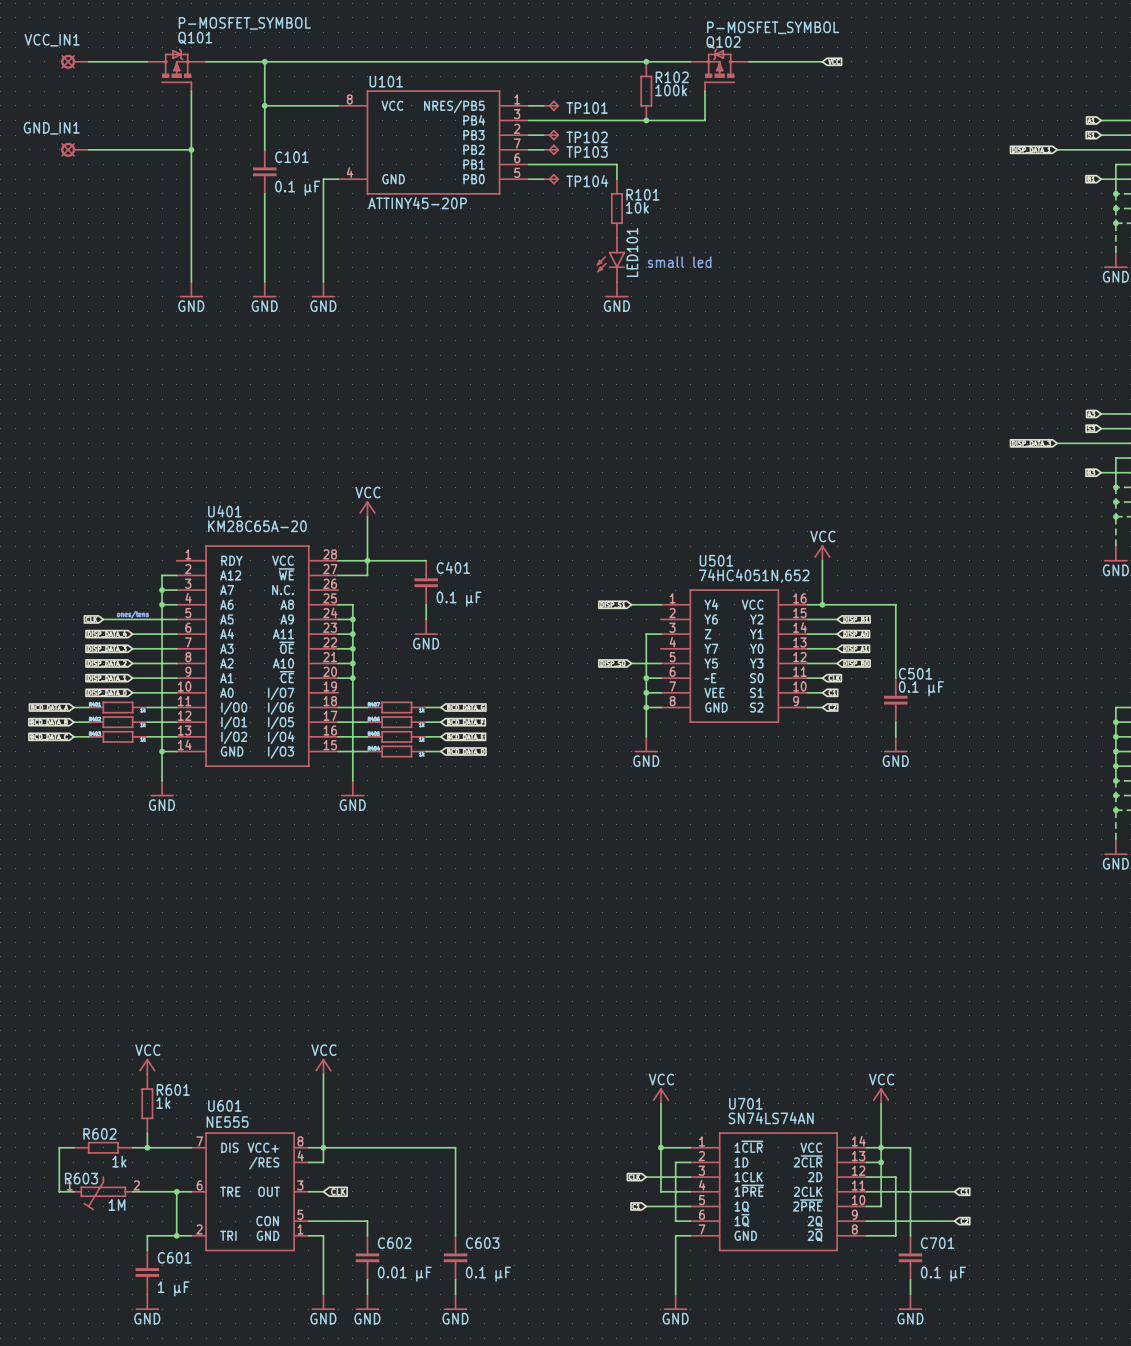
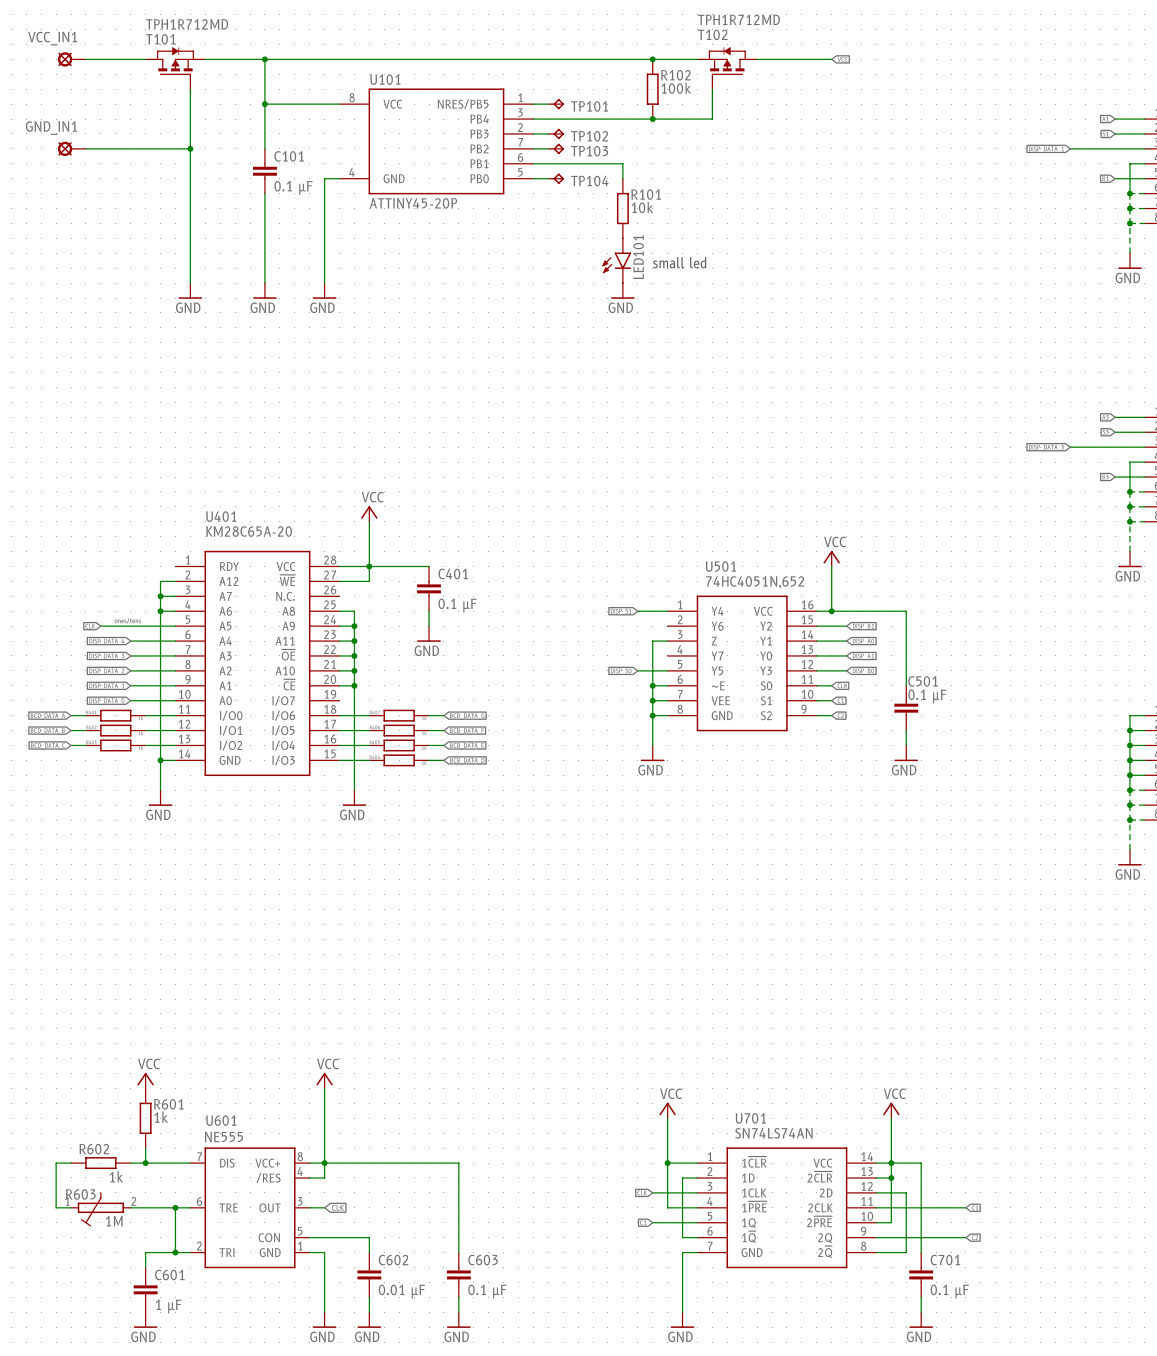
Q101: P-MOSFET_SYMBOL (176, 70) -> none
T101: none -> TPH1R712MD (175, 68)
Q102: P-MOSFET_SYMBOL (719, 70) -> none
T102: none -> TPH1R712MD (727, 68)

